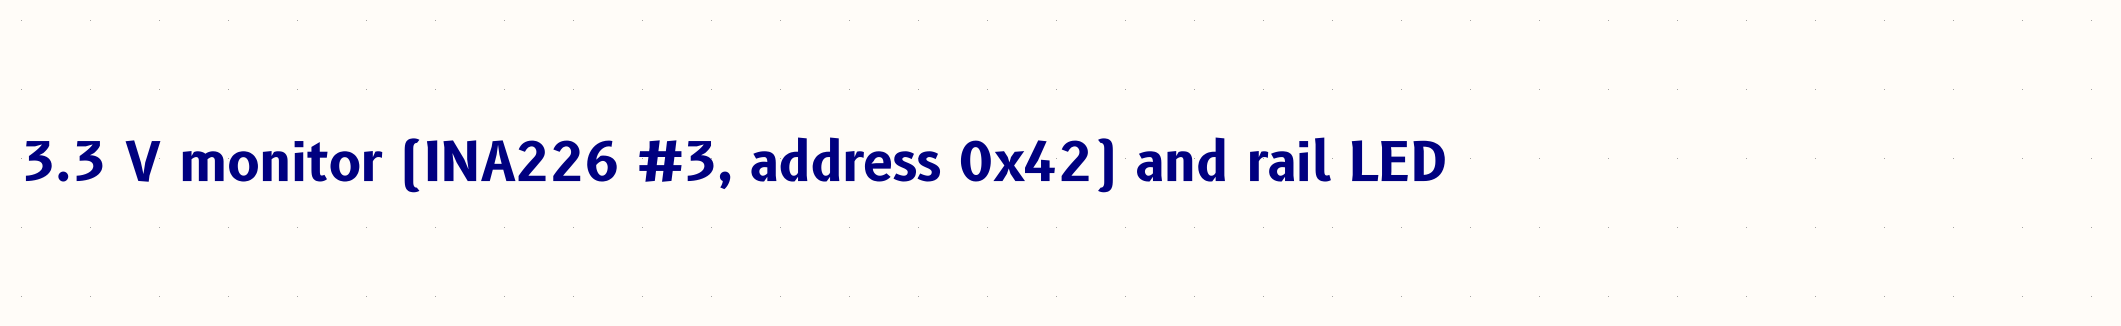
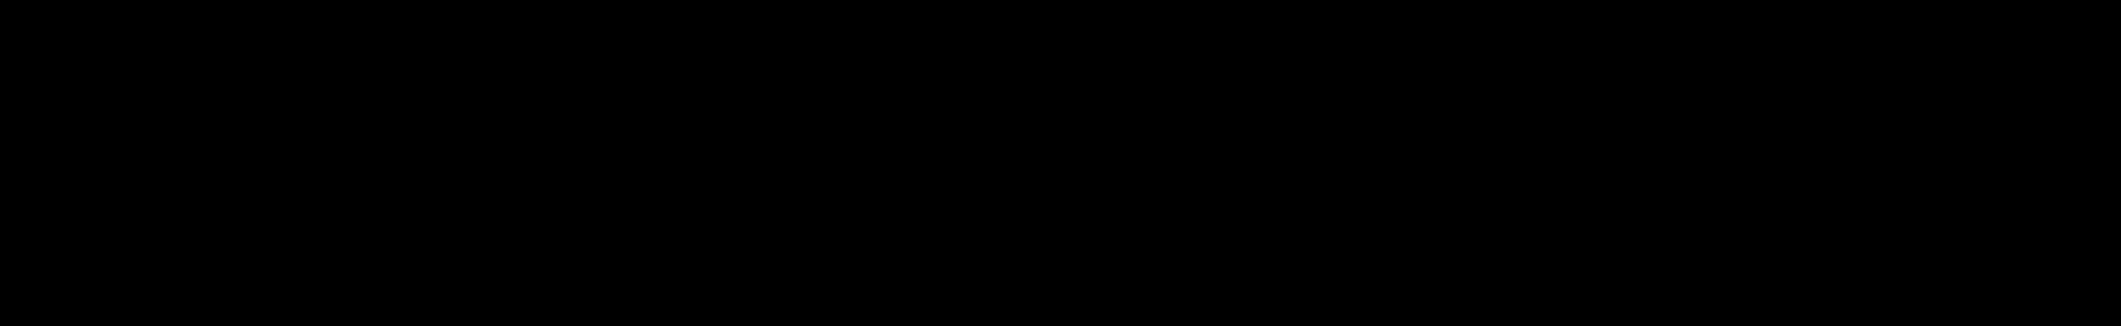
text: 3.3 V monitor (INA226 #3, address 0x42) and rail LED (735, 164) -> none

